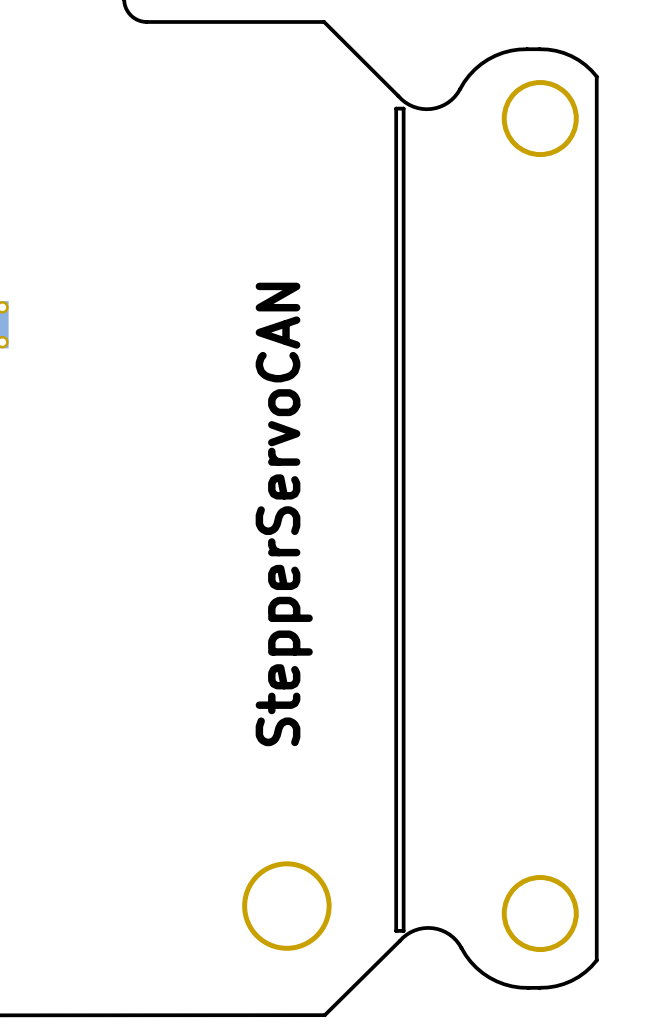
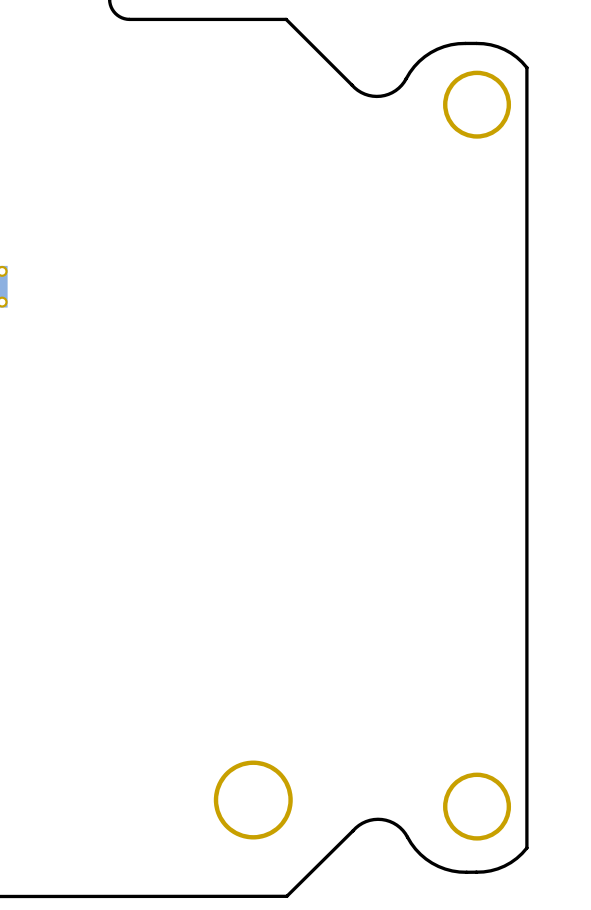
board edge: (403, 108) (396, 108) (396, 930) (403, 930) (403, 108) -> none
text: StepperServoCAN (284, 514) -> none

